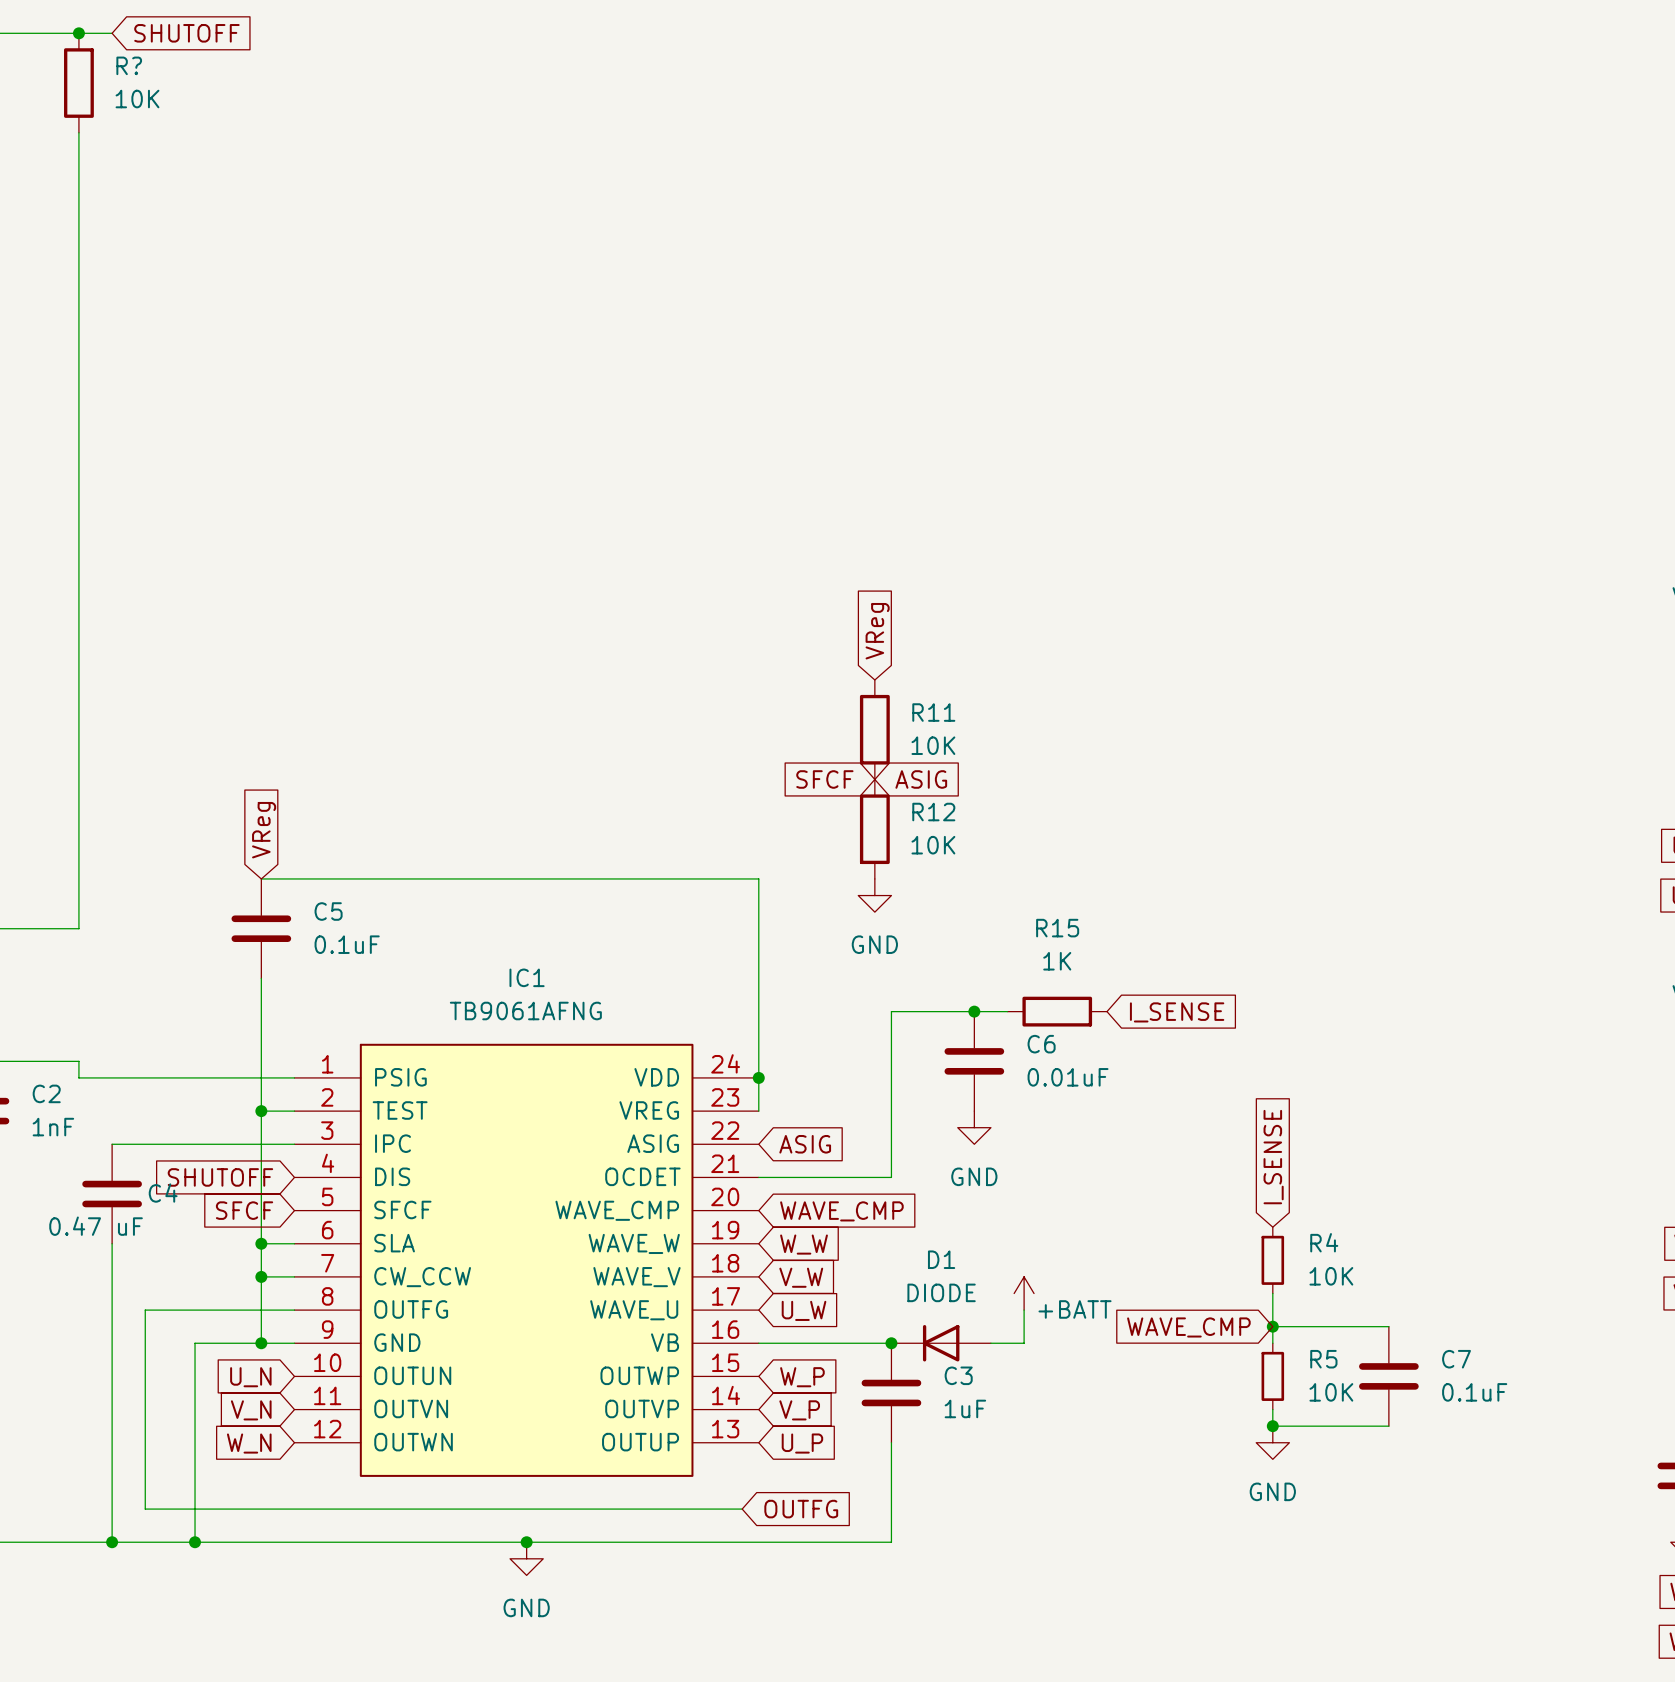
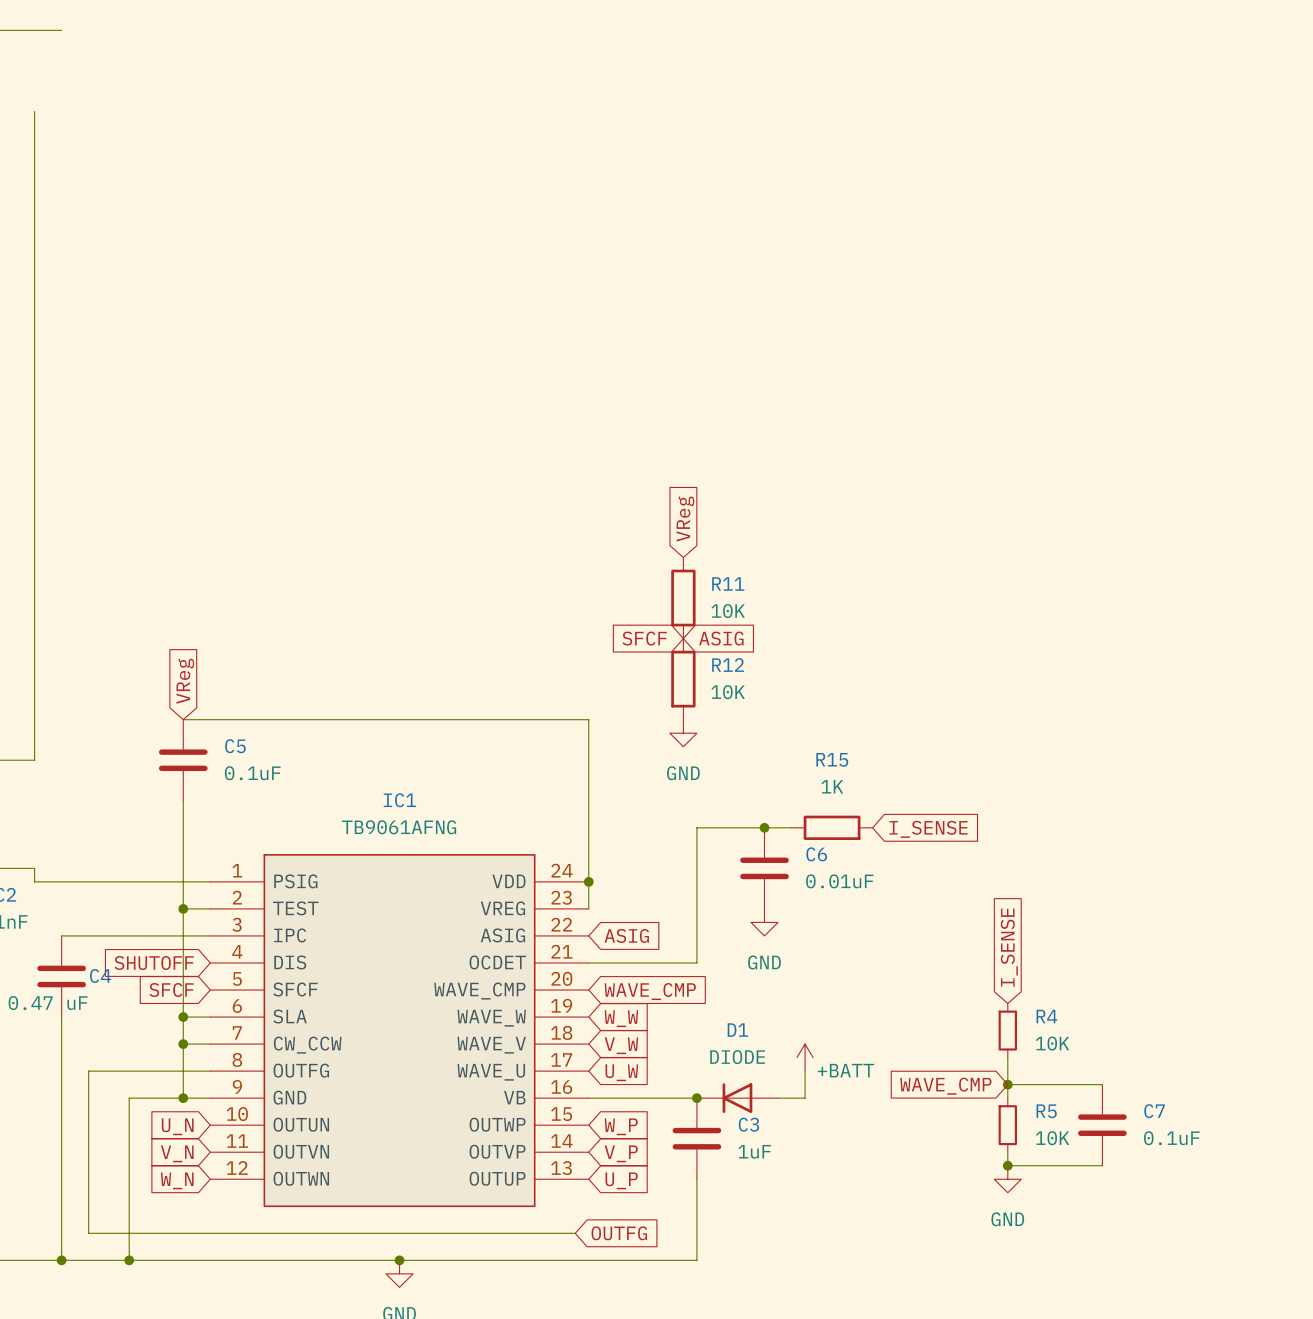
junction: (78, 33) -> none
global label: SHUTOFF (186, 33) -> none
R?: 10K (78, 83) -> none

